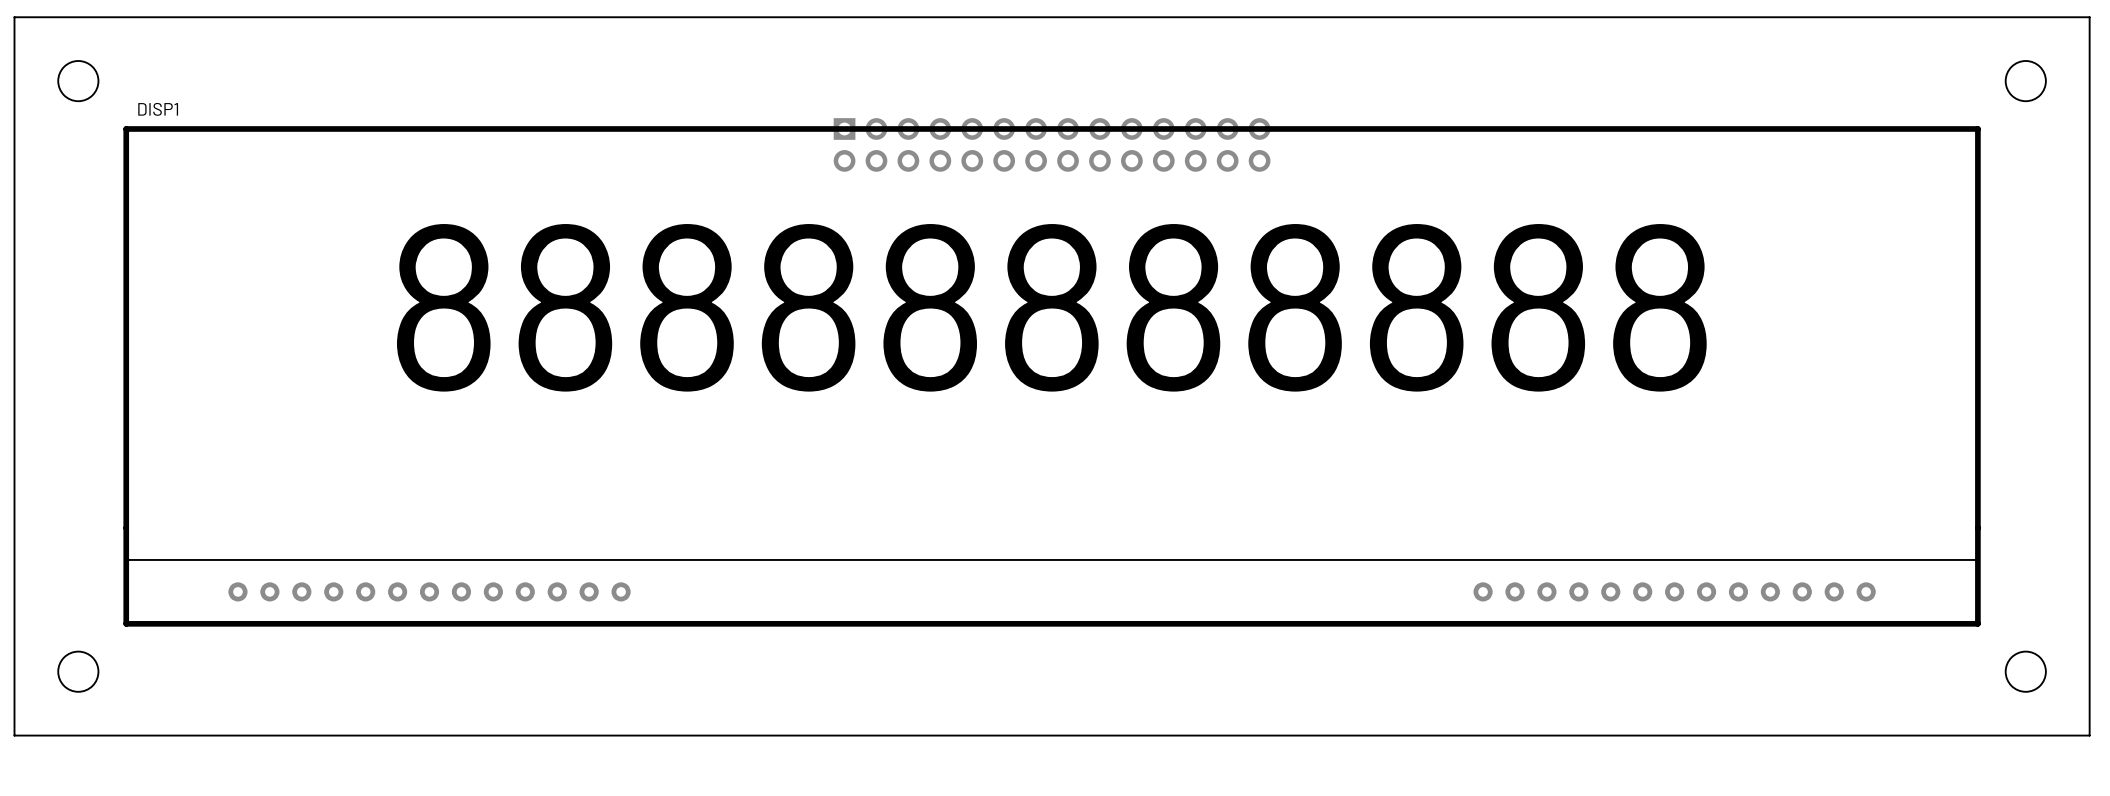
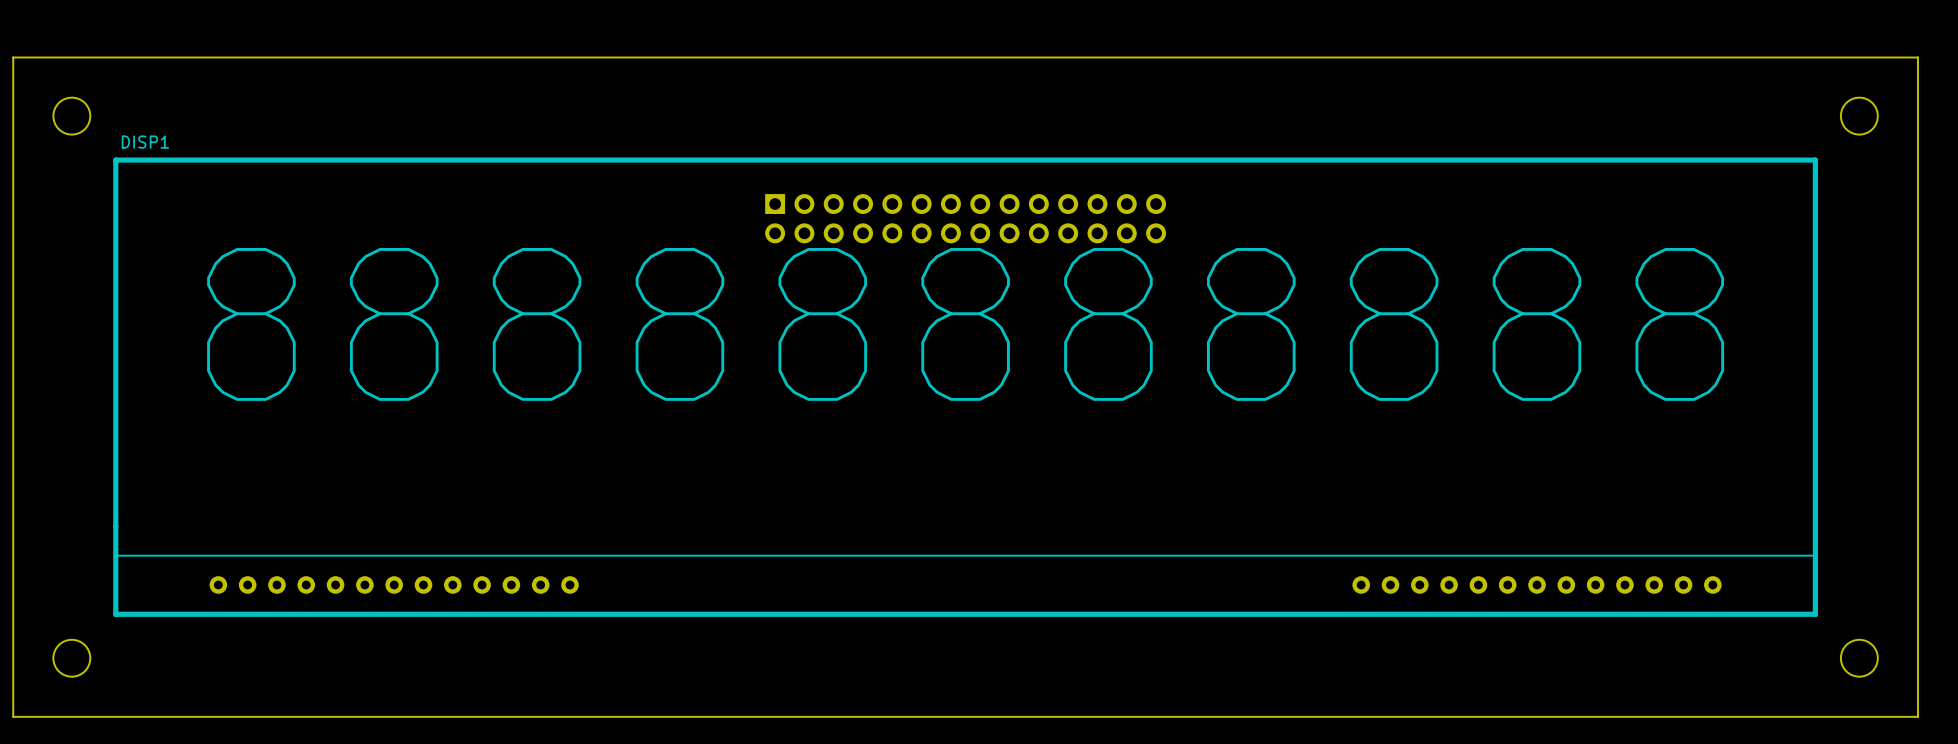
part position: (1052, 144) -> (965, 218)

